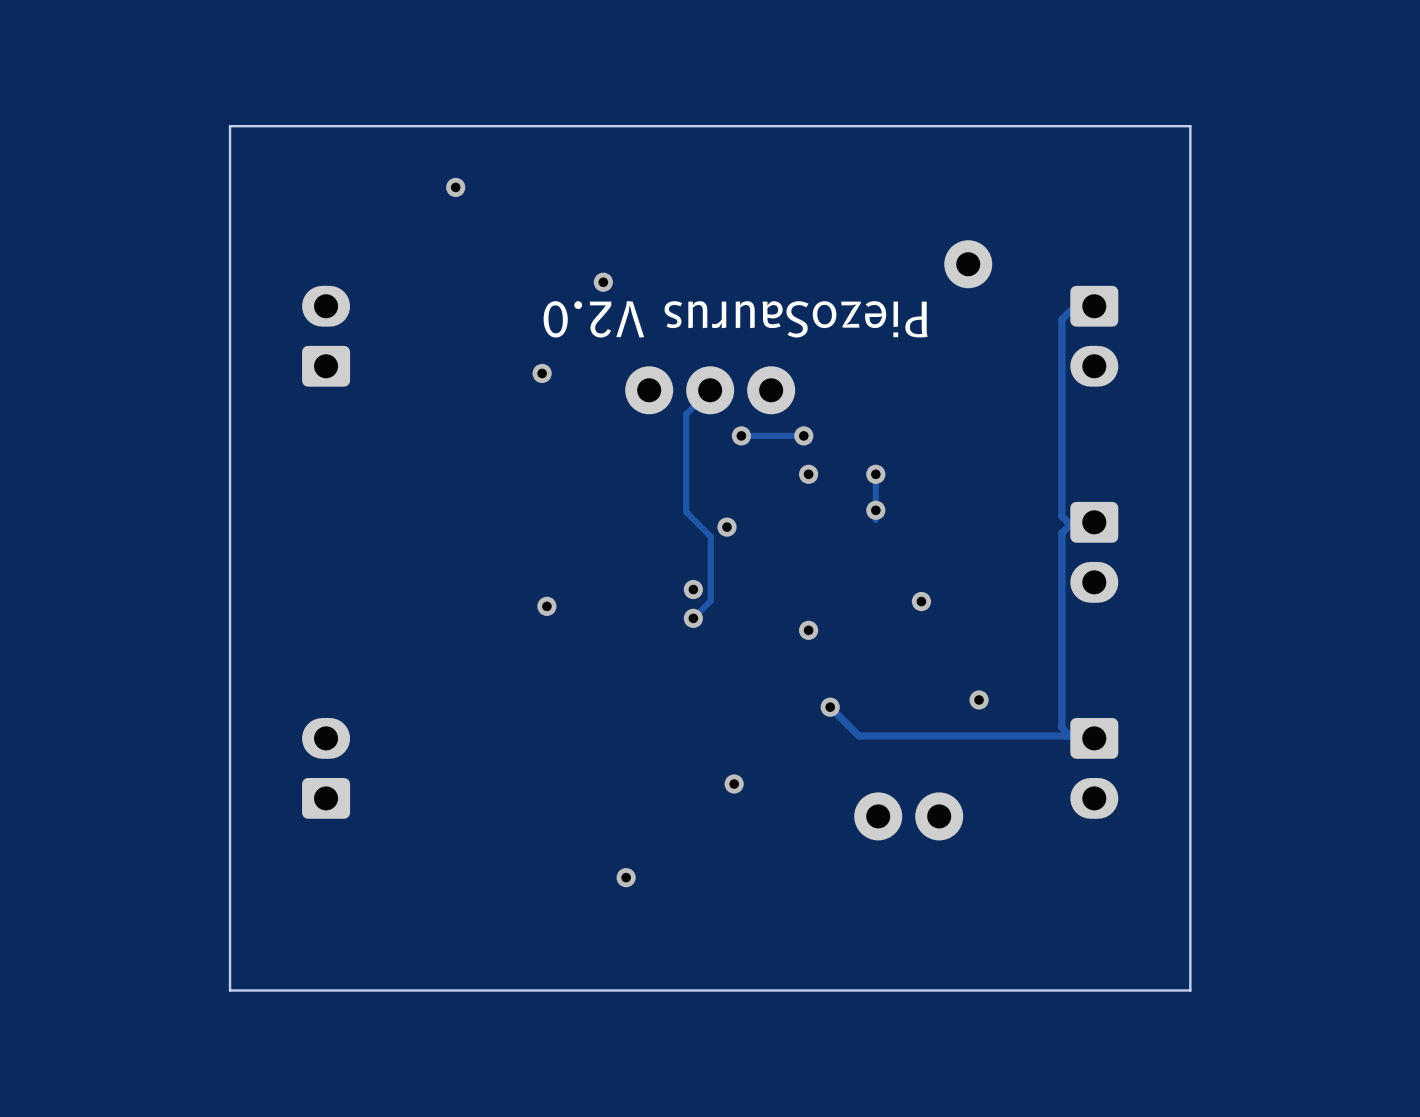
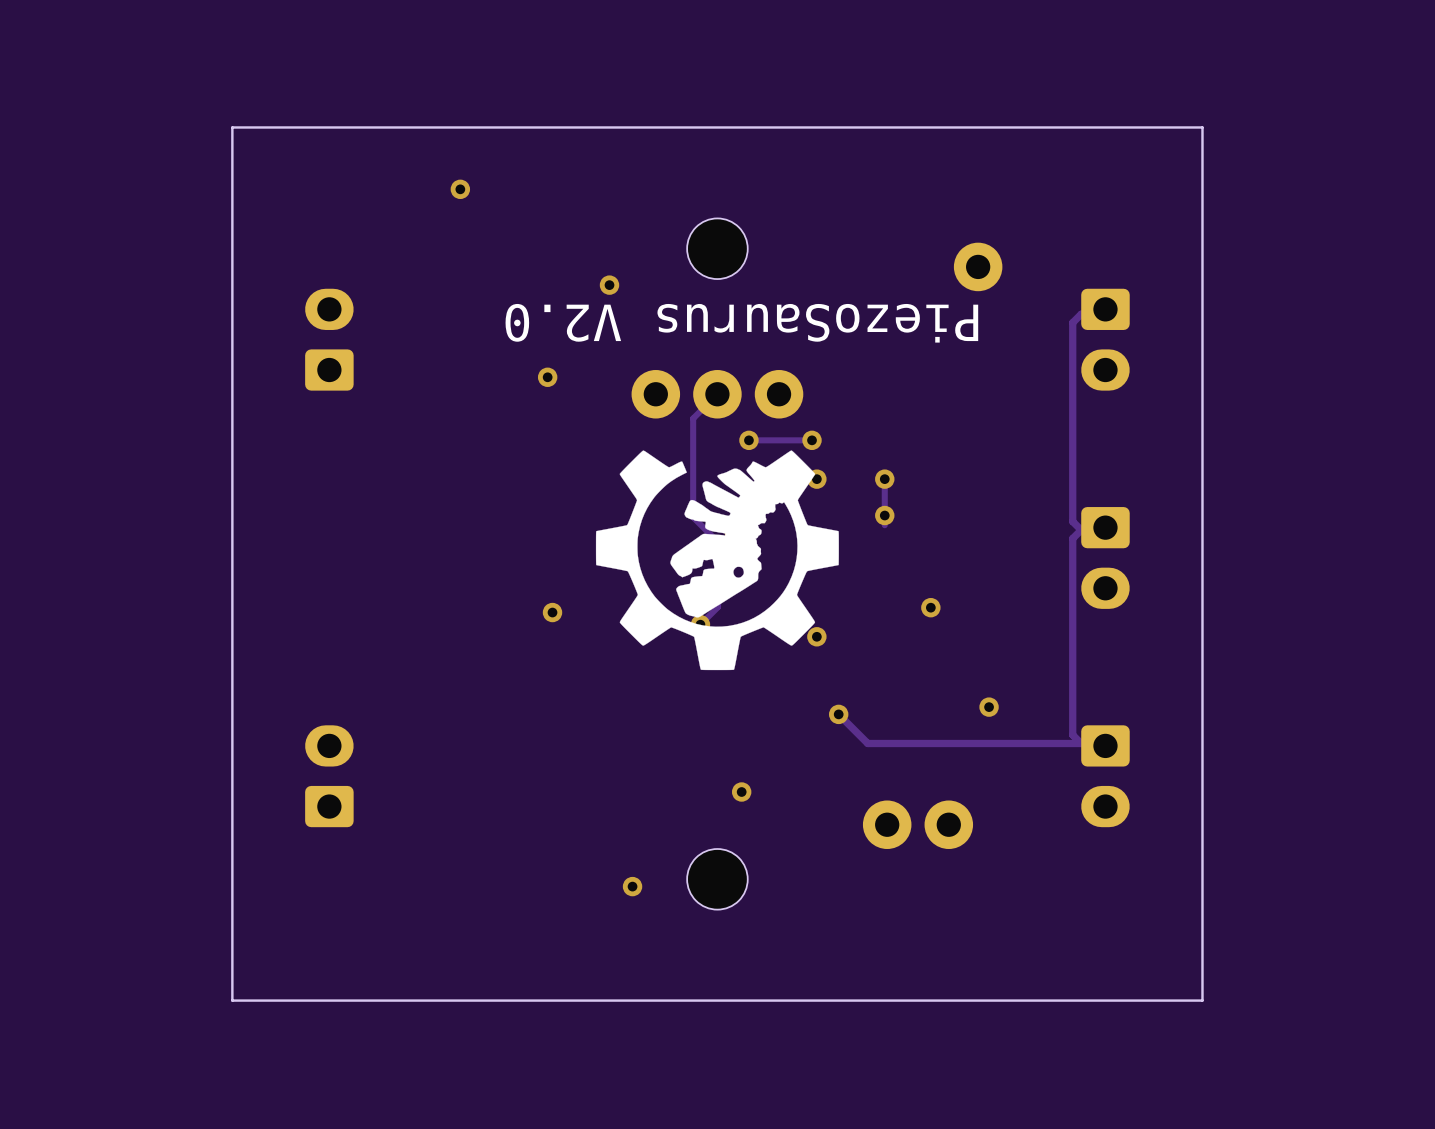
part: none -> (717, 248)
drawing: none -> [595, 450, 839, 671]
part: none -> (717, 879)

